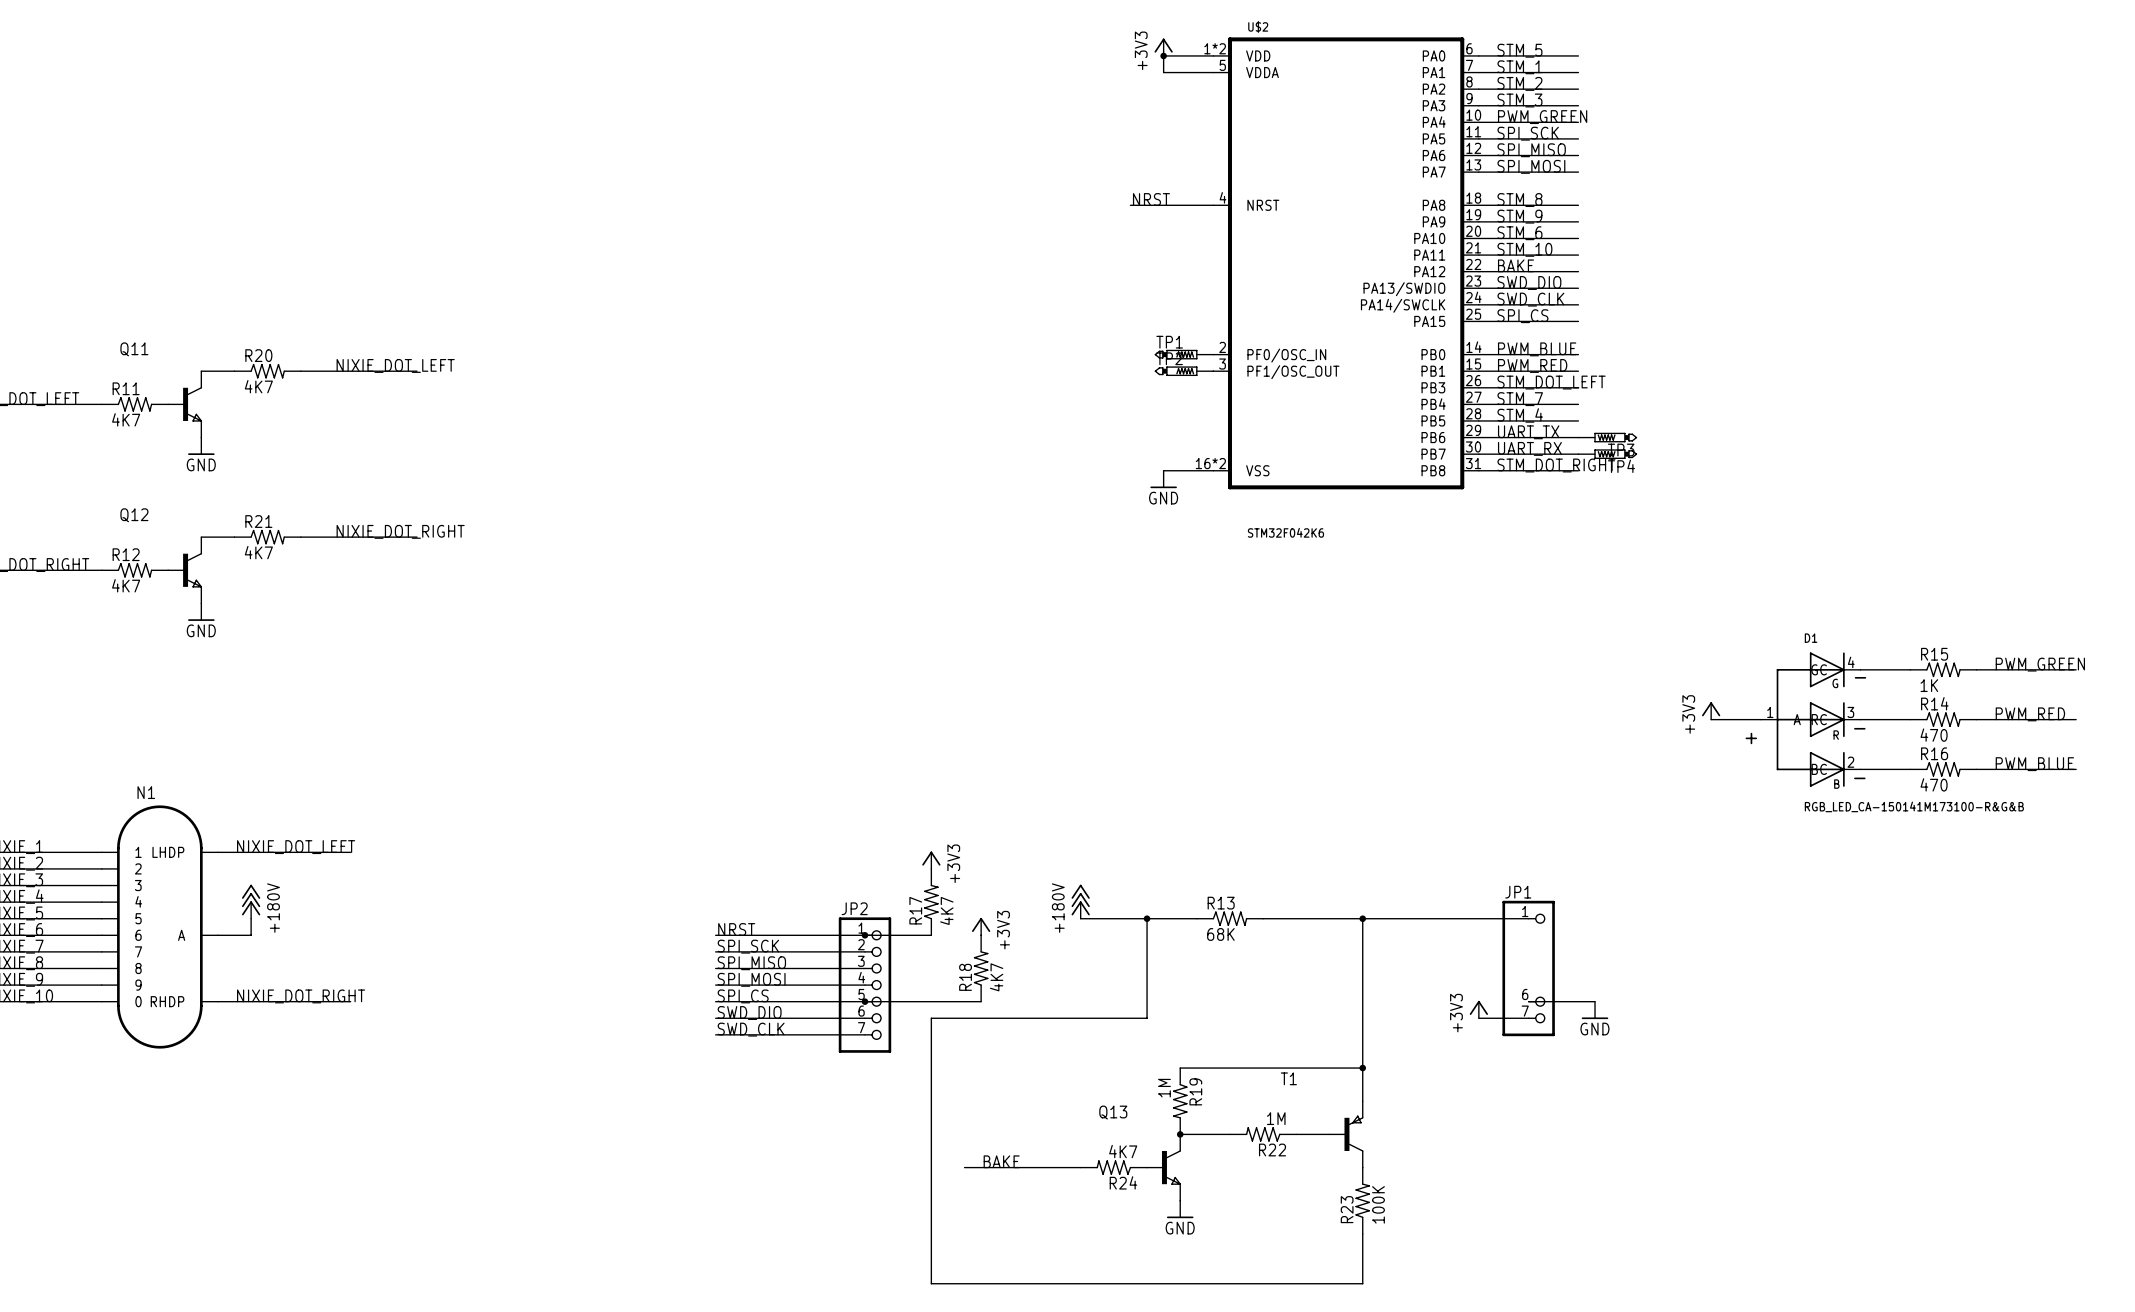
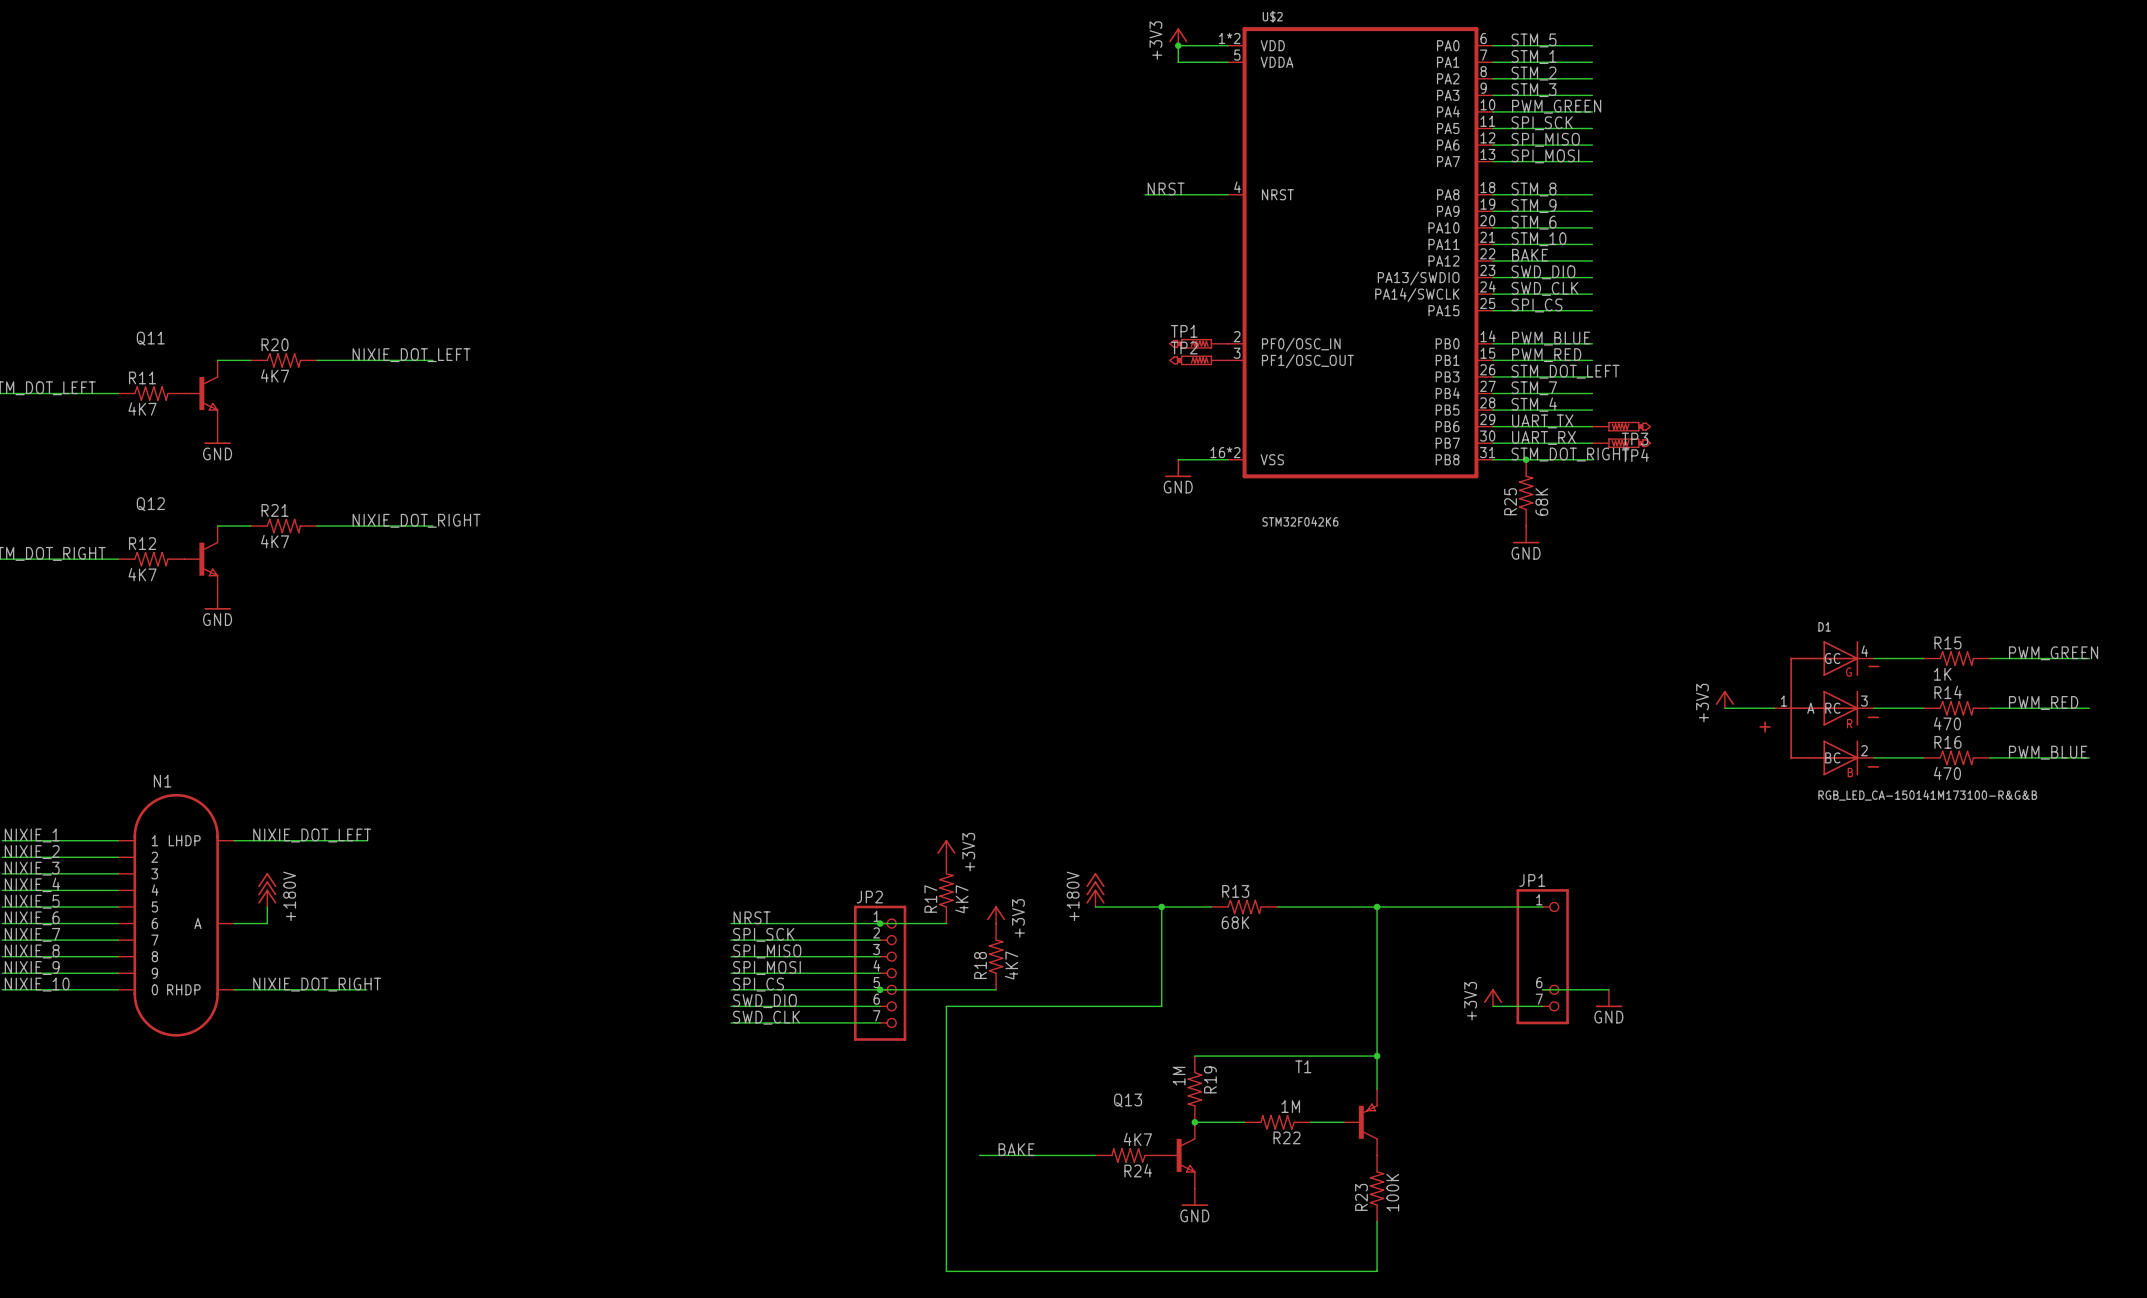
junction: none -> (1526, 459)
R25: none -> 68K (1526, 492)
power symbol: none -> GND (1526, 534)

